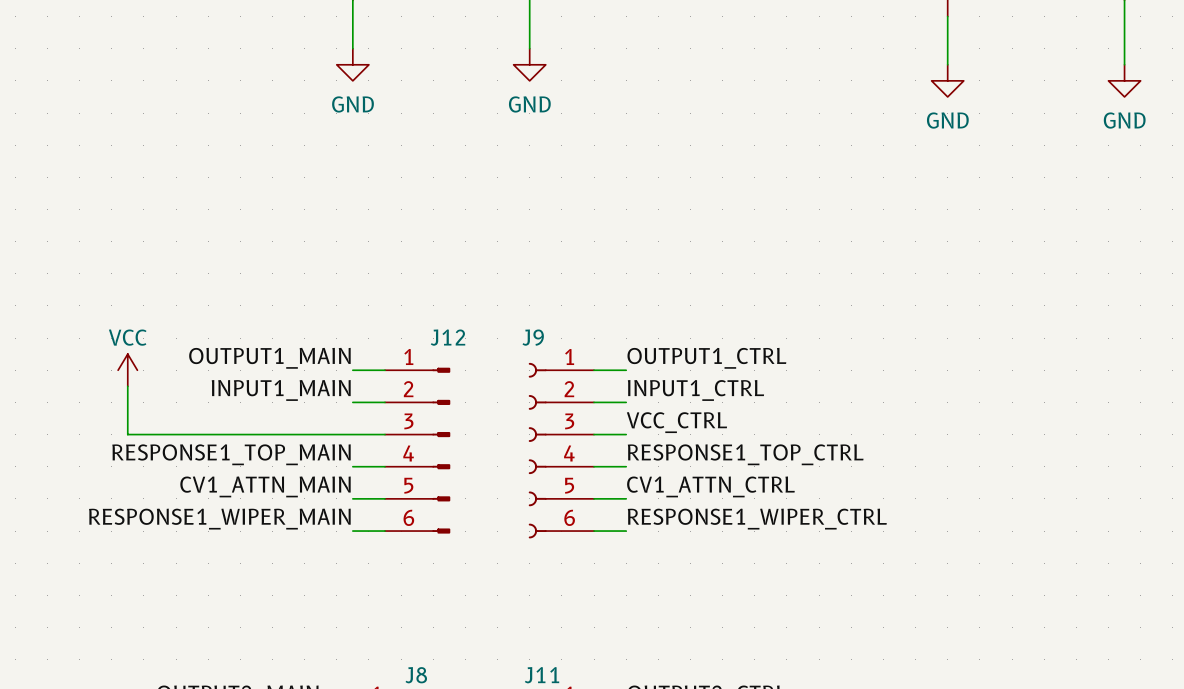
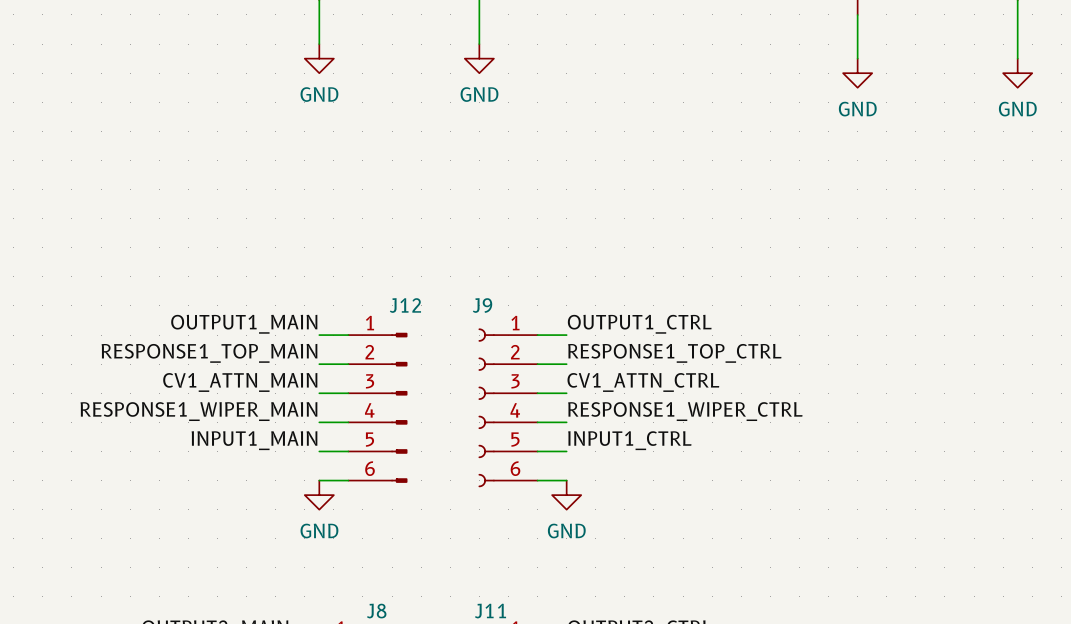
power symbol: VCC (127, 370) -> none
wire: (127, 386) (127, 434) (352, 434) -> none
label: INPUT1_MAIN (281, 390) -> RESPONSE1_TOP_MAIN (209, 353)
label: INPUT1_CTRL (695, 390) -> RESPONSE1_TOP_CTRL (674, 353)
label: none -> CV1_ATTN_MAIN (240, 382)
label: VCC_CTRL (676, 422) -> CV1_ATTN_CTRL (643, 382)
label: RESPONSE1_TOP_MAIN (231, 454) -> RESPONSE1_WIPER_MAIN (198, 411)
label: RESPONSE1_TOP_CTRL (745, 454) -> RESPONSE1_WIPER_CTRL (685, 411)
label: CV1_ATTN_MAIN (265, 486) -> INPUT1_MAIN (254, 440)
label: CV1_ATTN_CTRL (710, 486) -> INPUT1_CTRL (629, 440)
label: RESPONSE1_WIPER_MAIN (219, 519) -> none
label: RESPONSE1_WIPER_CTRL (757, 519) -> none
power symbol: none -> GND (319, 495)
power symbol: none -> GND (566, 495)

